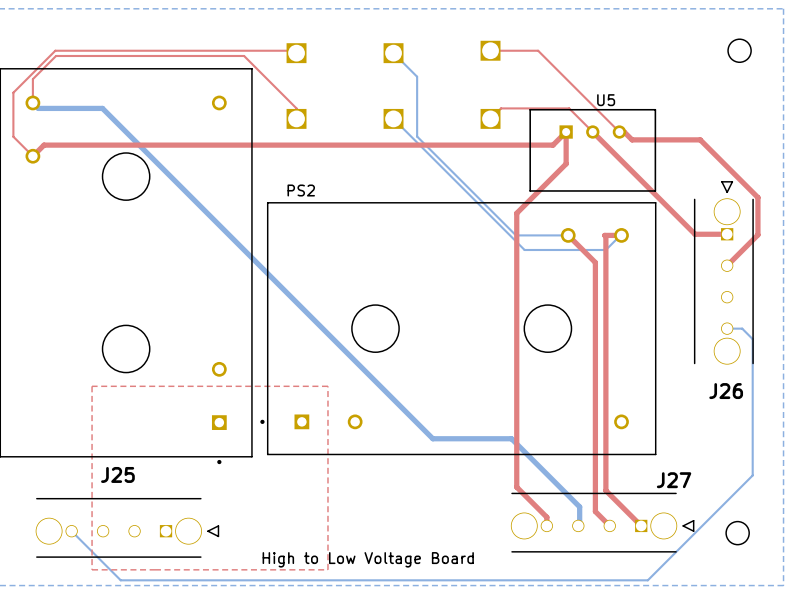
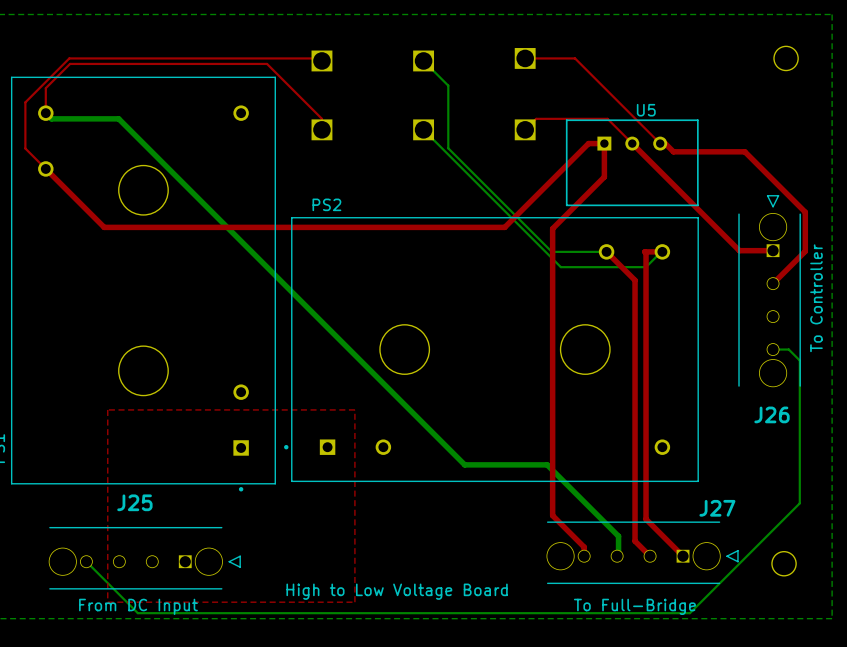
top track: (566, 132) (553, 145) (44, 145) (32, 156) -> (604, 143) (588, 143) (504, 227) (104, 227) (45, 168)
text: none -> To Controller (816, 298)
text: none -> From DC Input (138, 606)
text: none -> To Full-Bridge (634, 606)

